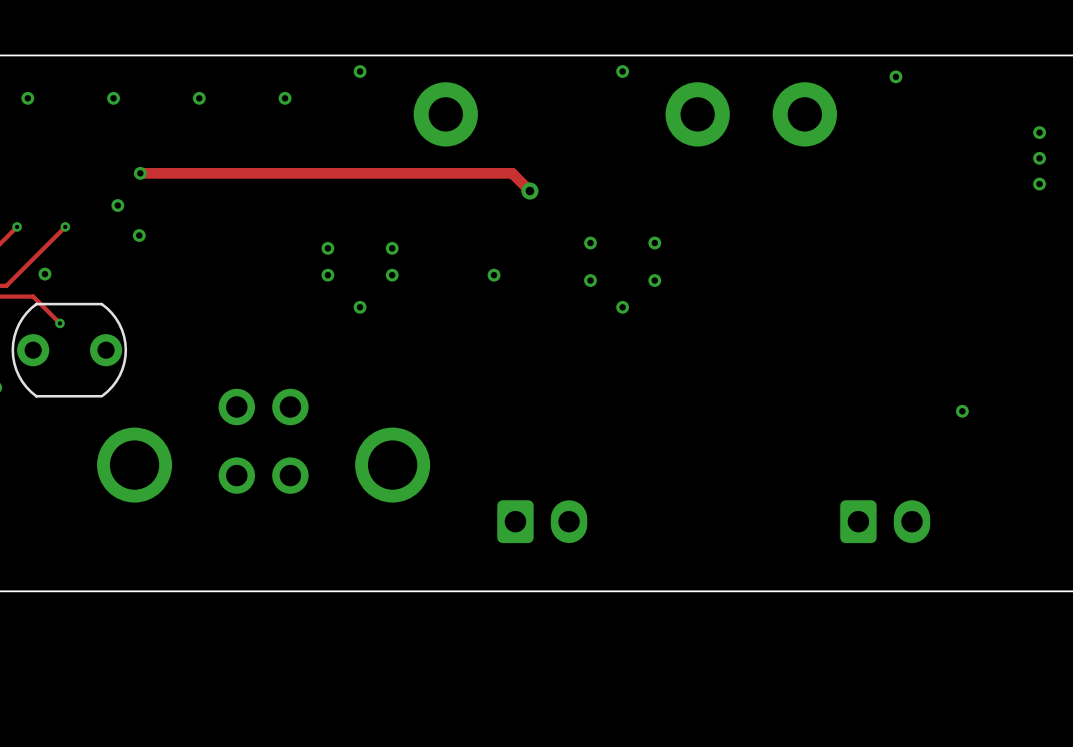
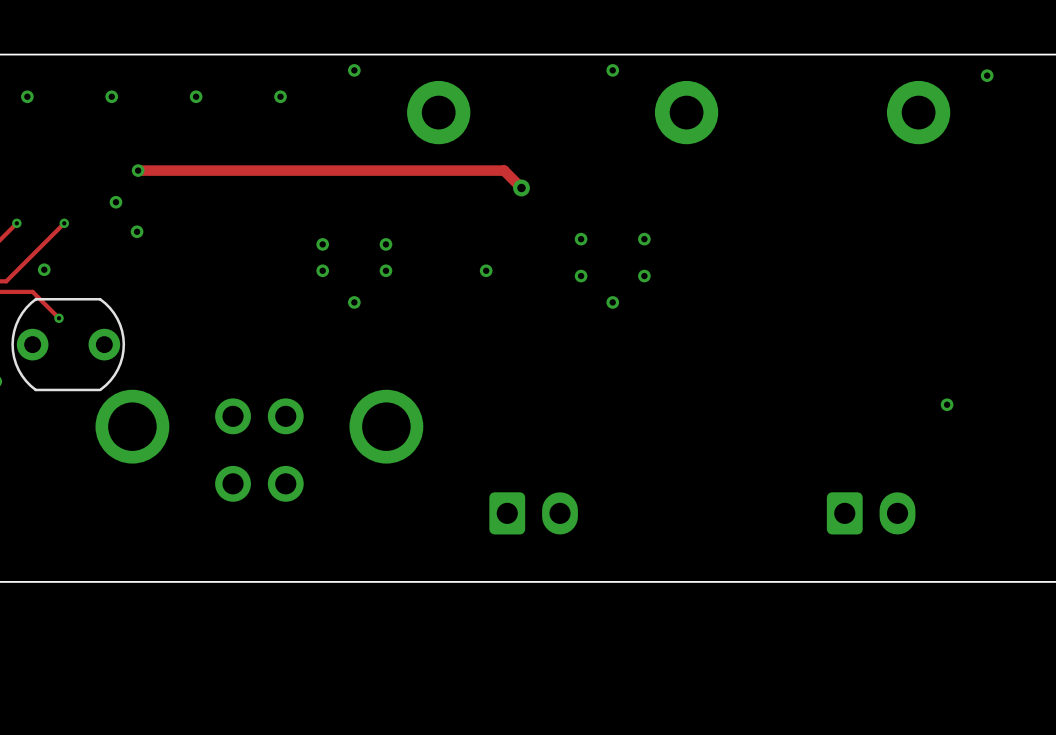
via: (895, 76) -> none
via: none -> (987, 75)
part position: (804, 114) -> (918, 112)
via: (1039, 132) -> none
via: (1039, 158) -> none
via: (1039, 184) -> none
part rotation: 0° (263, 445) -> 180° (259, 445)

